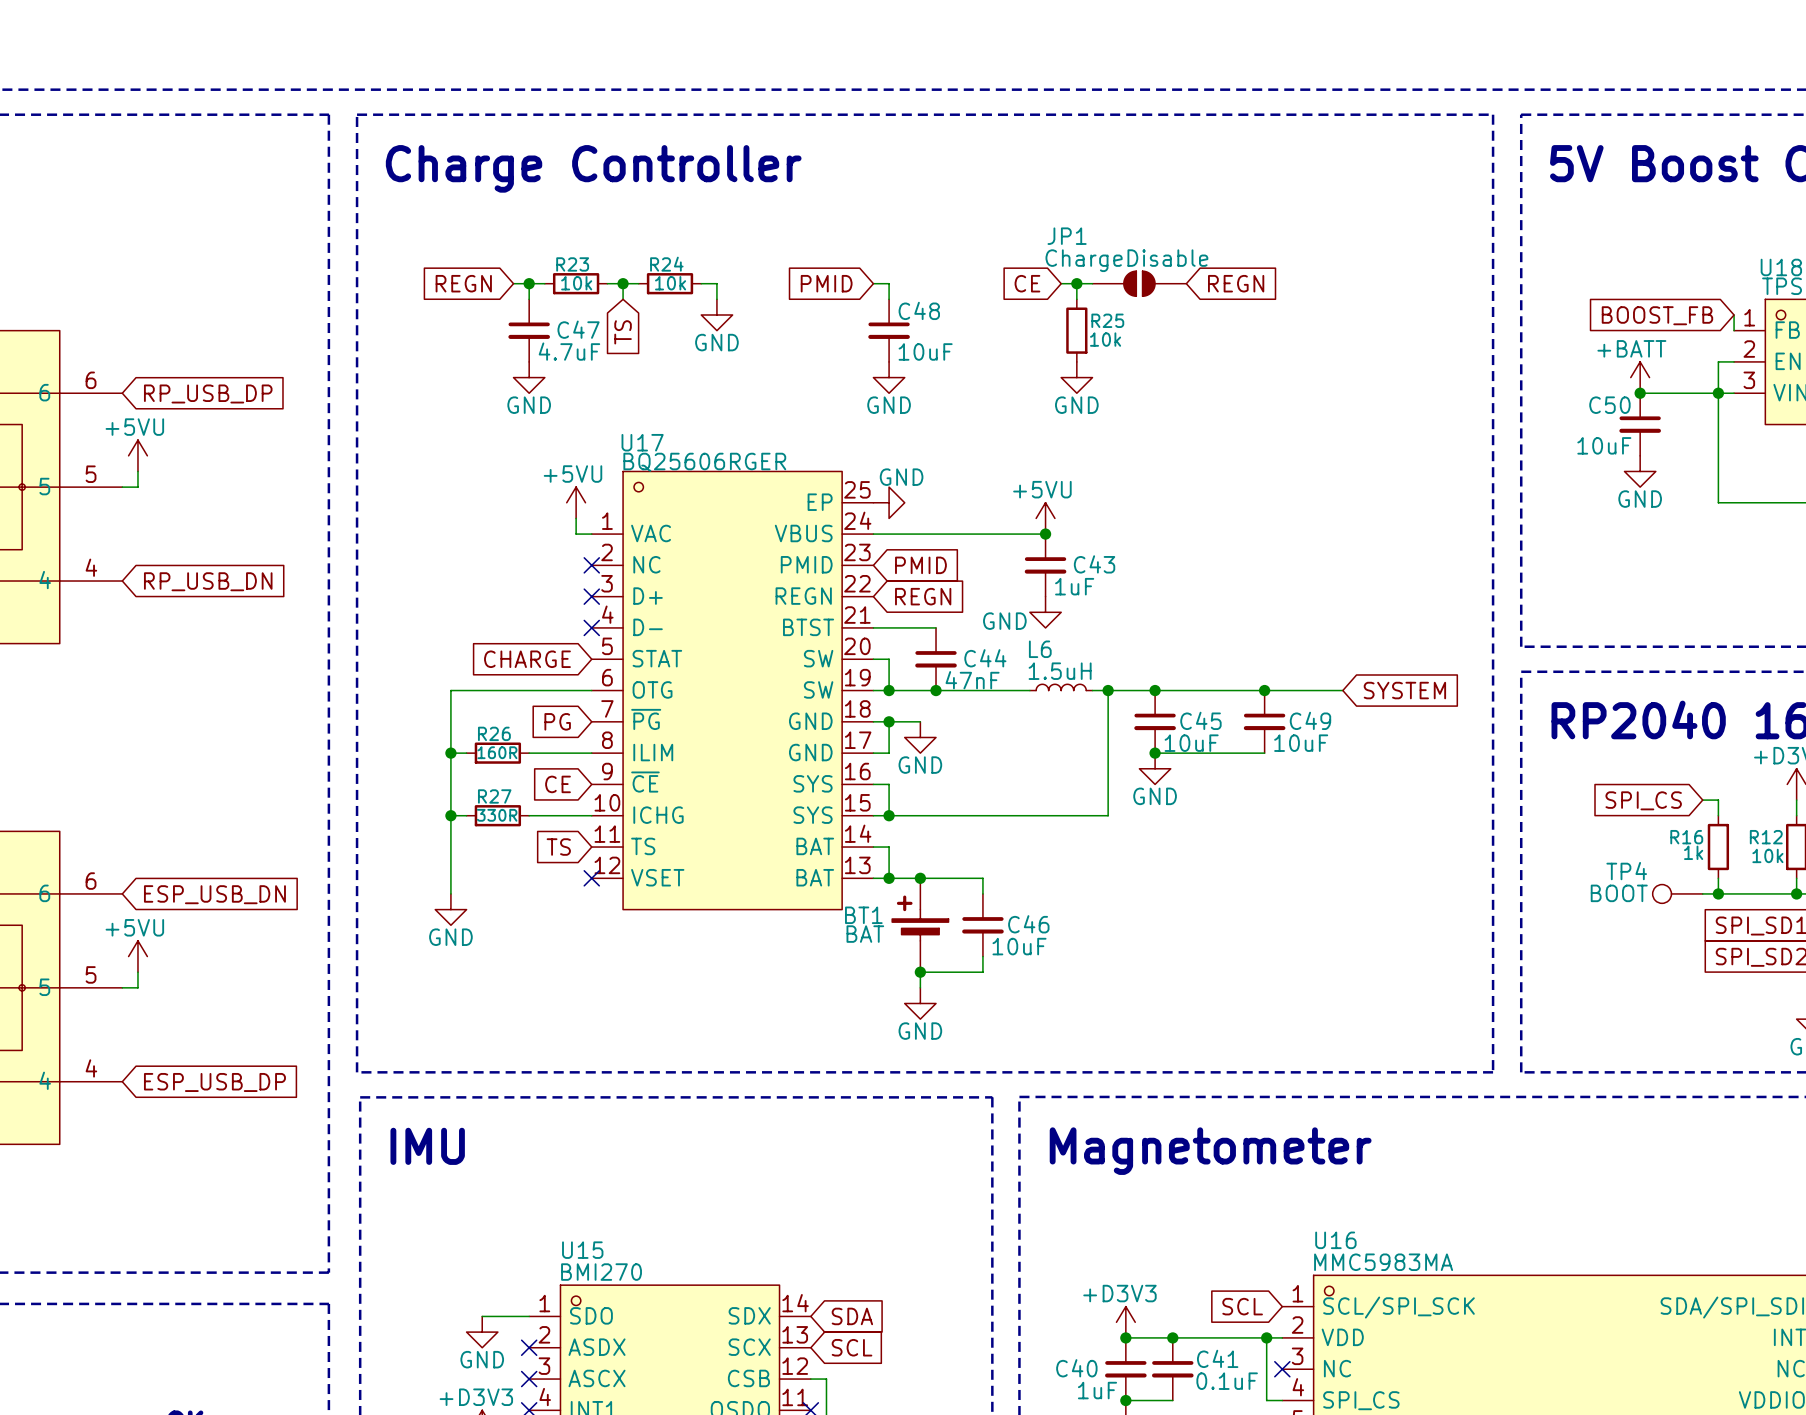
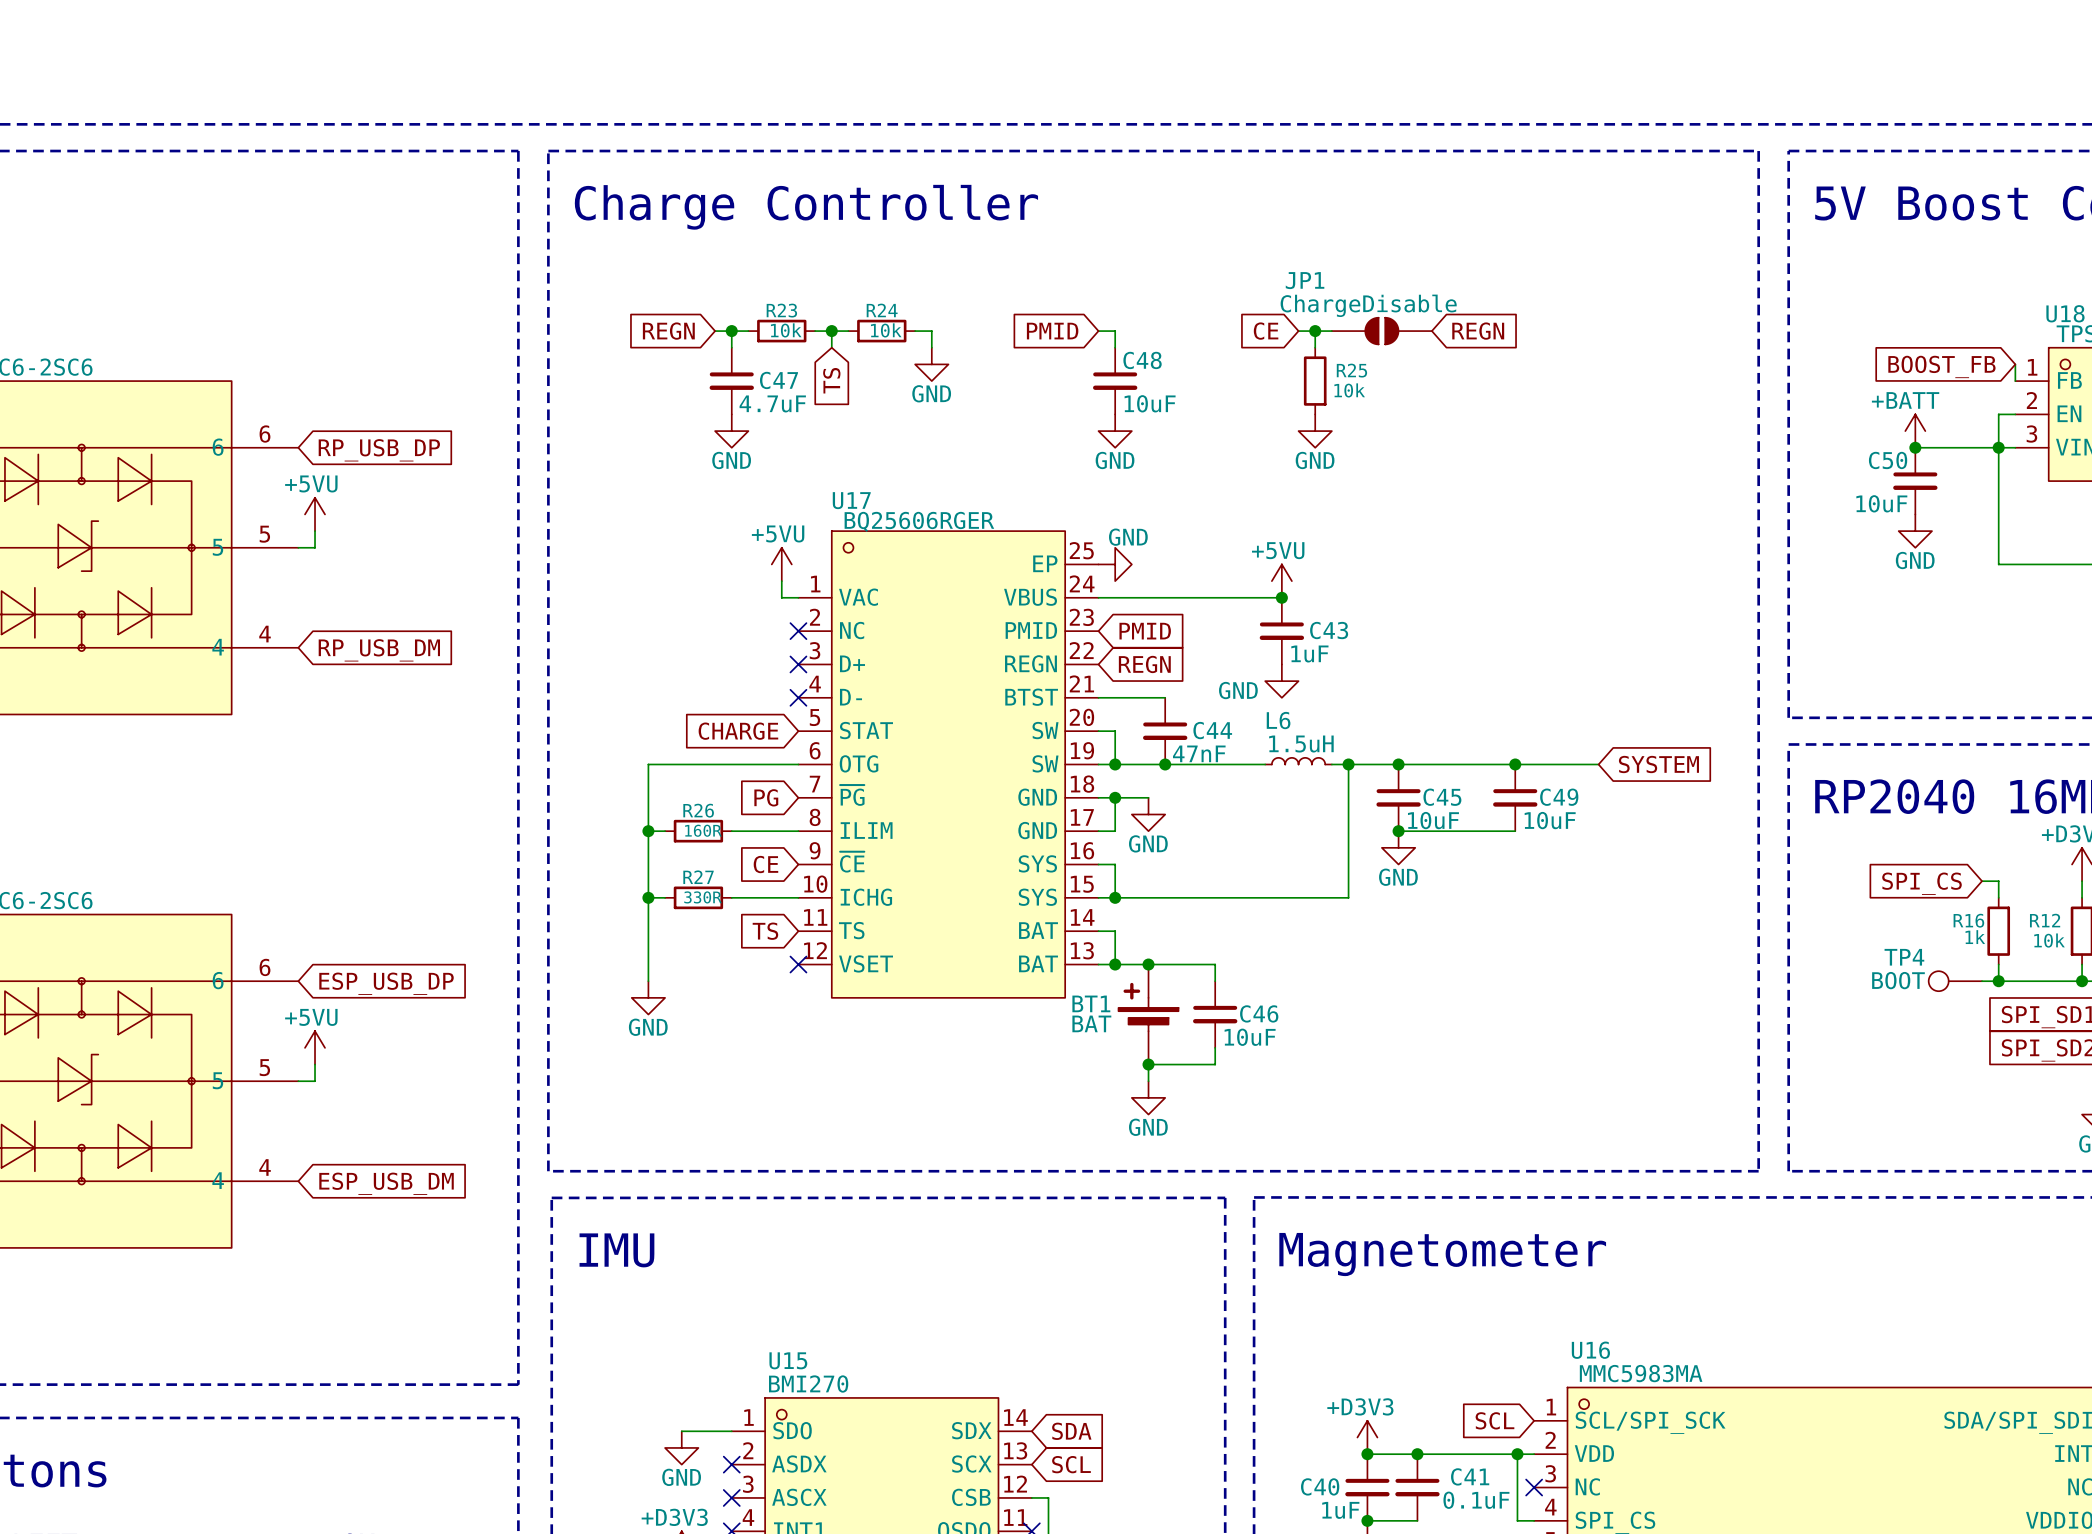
global label: RP_USB_DN (208, 581) -> RP_USB_DM (379, 650)
global label: ESP_USB_DN (214, 894) -> ESP_USB_DP (386, 983)
global label: ESP_USB_DP (214, 1082) -> ESP_USB_DM (386, 1183)

